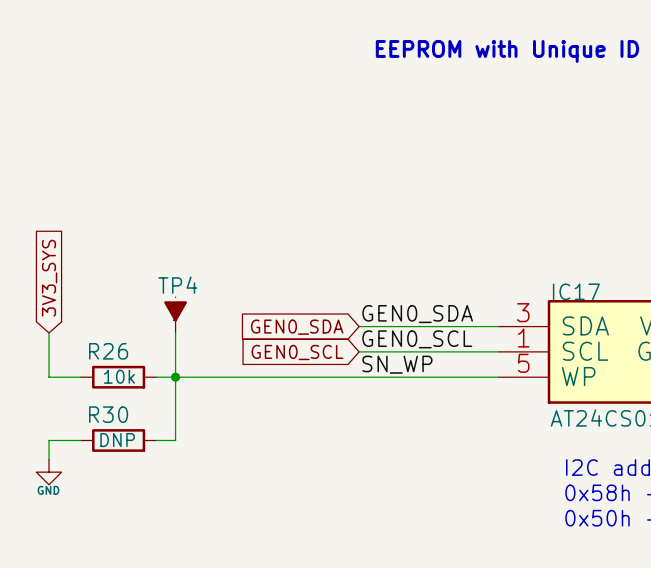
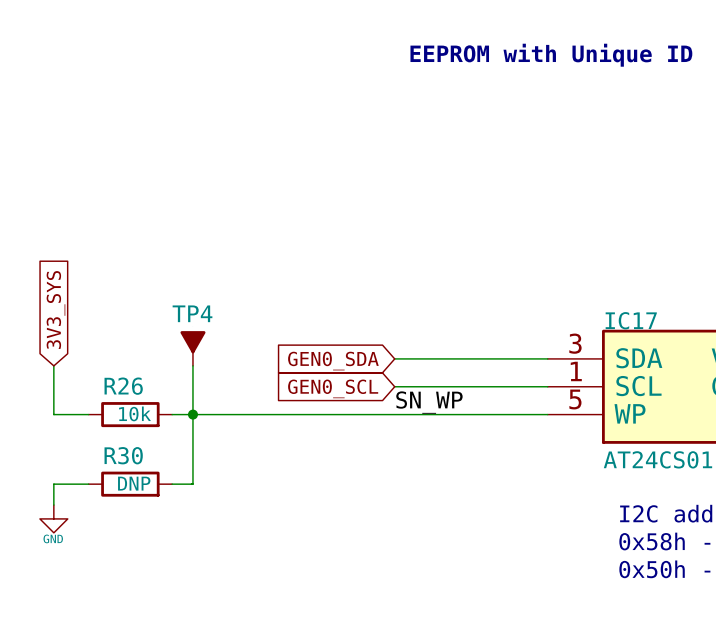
label: GEN0_SDA (417, 314) -> none
label: GEN0_SCL (417, 339) -> none

